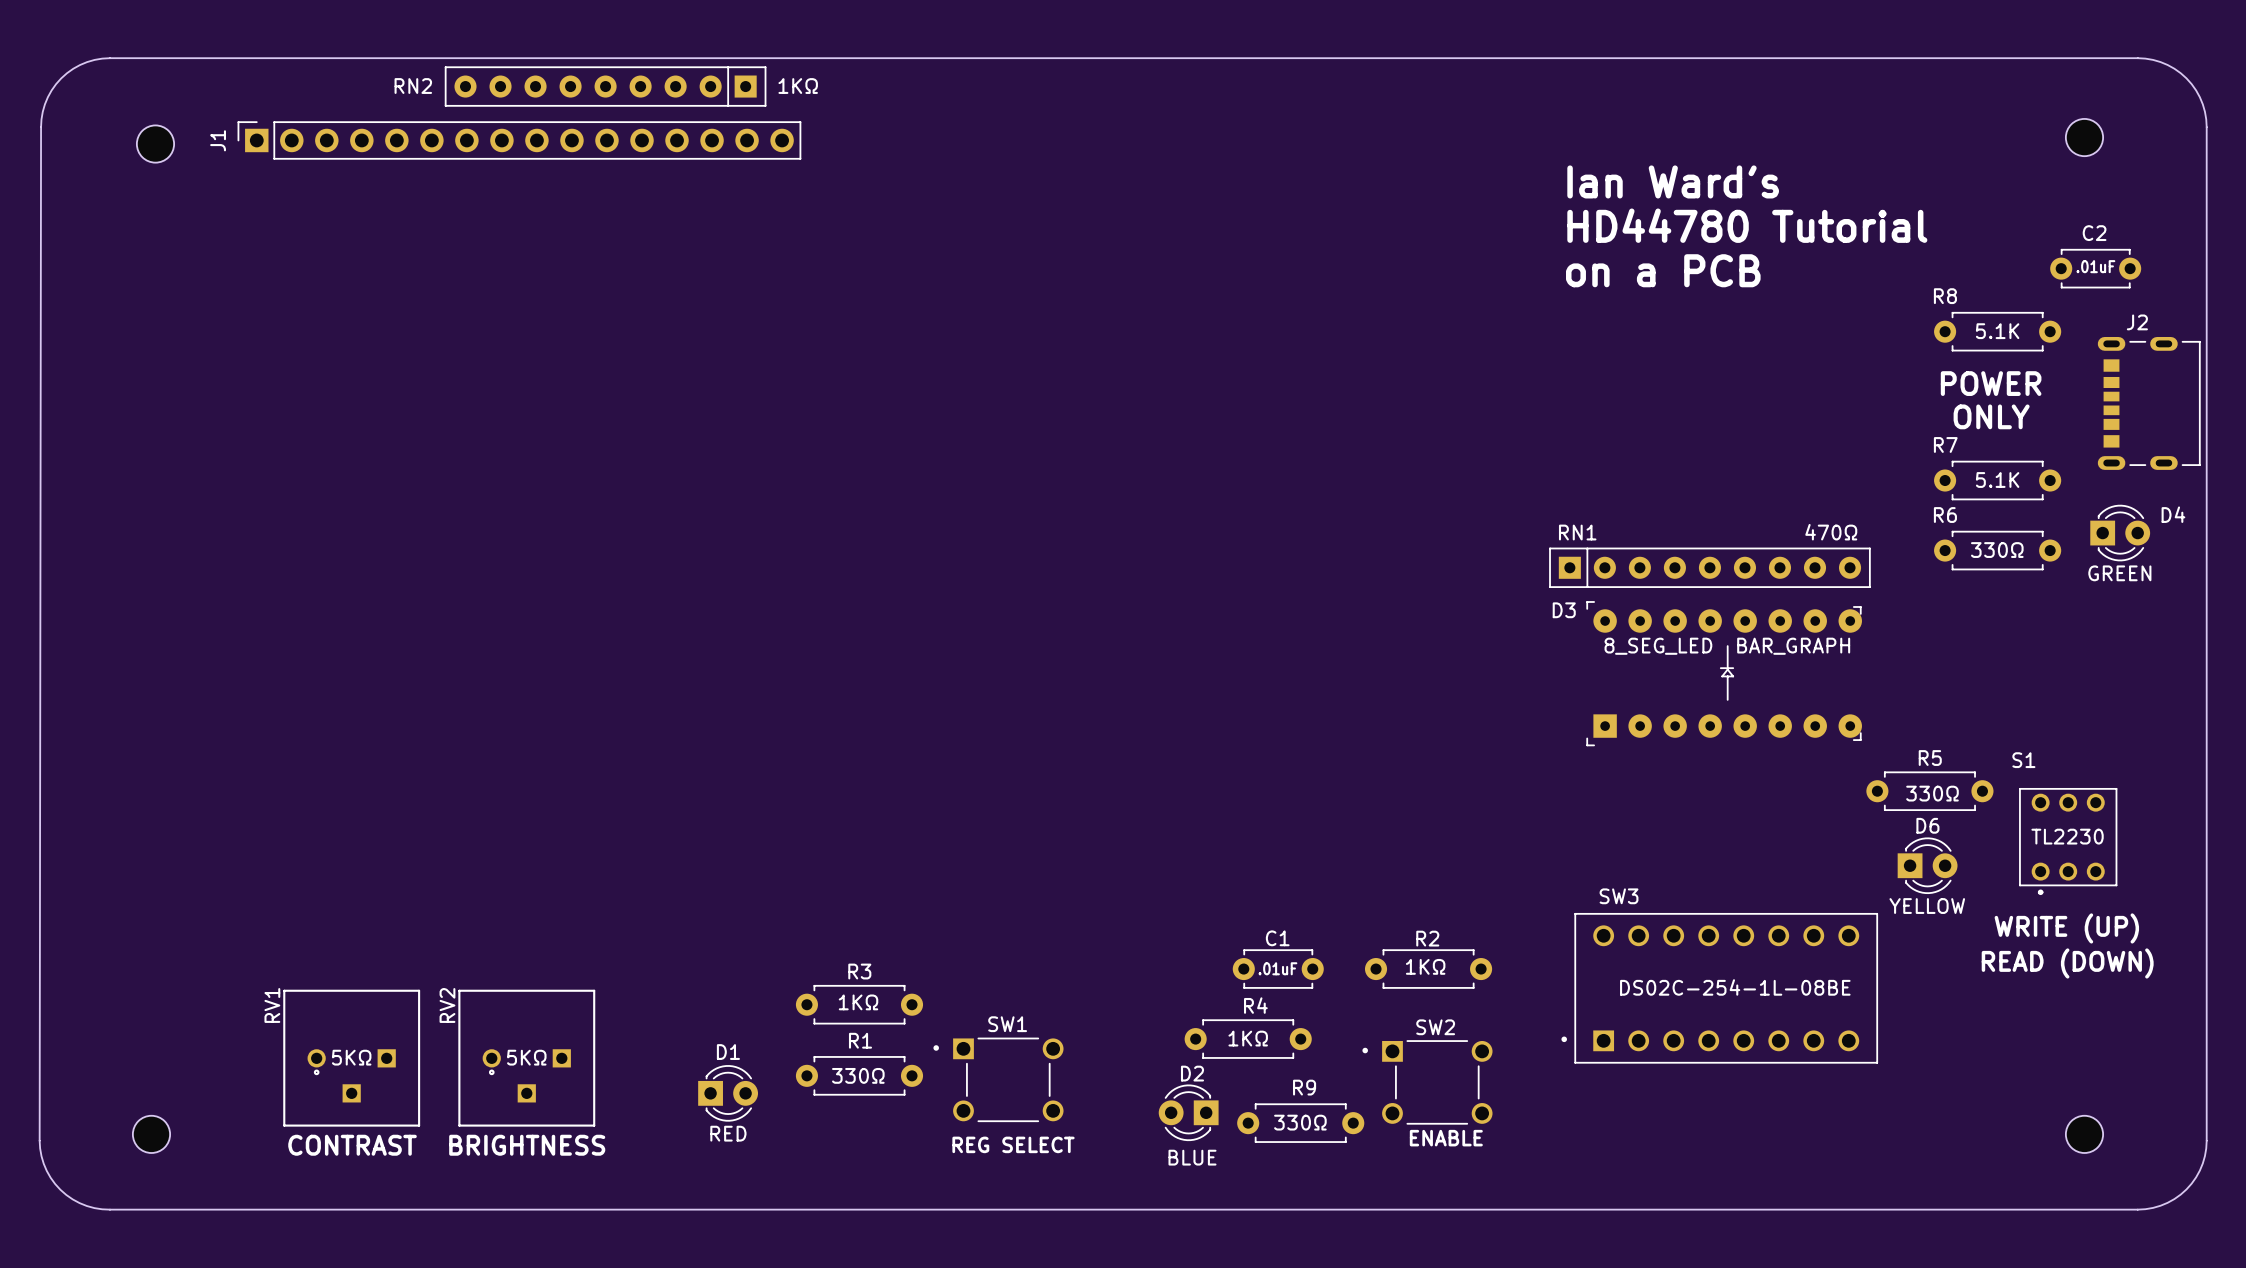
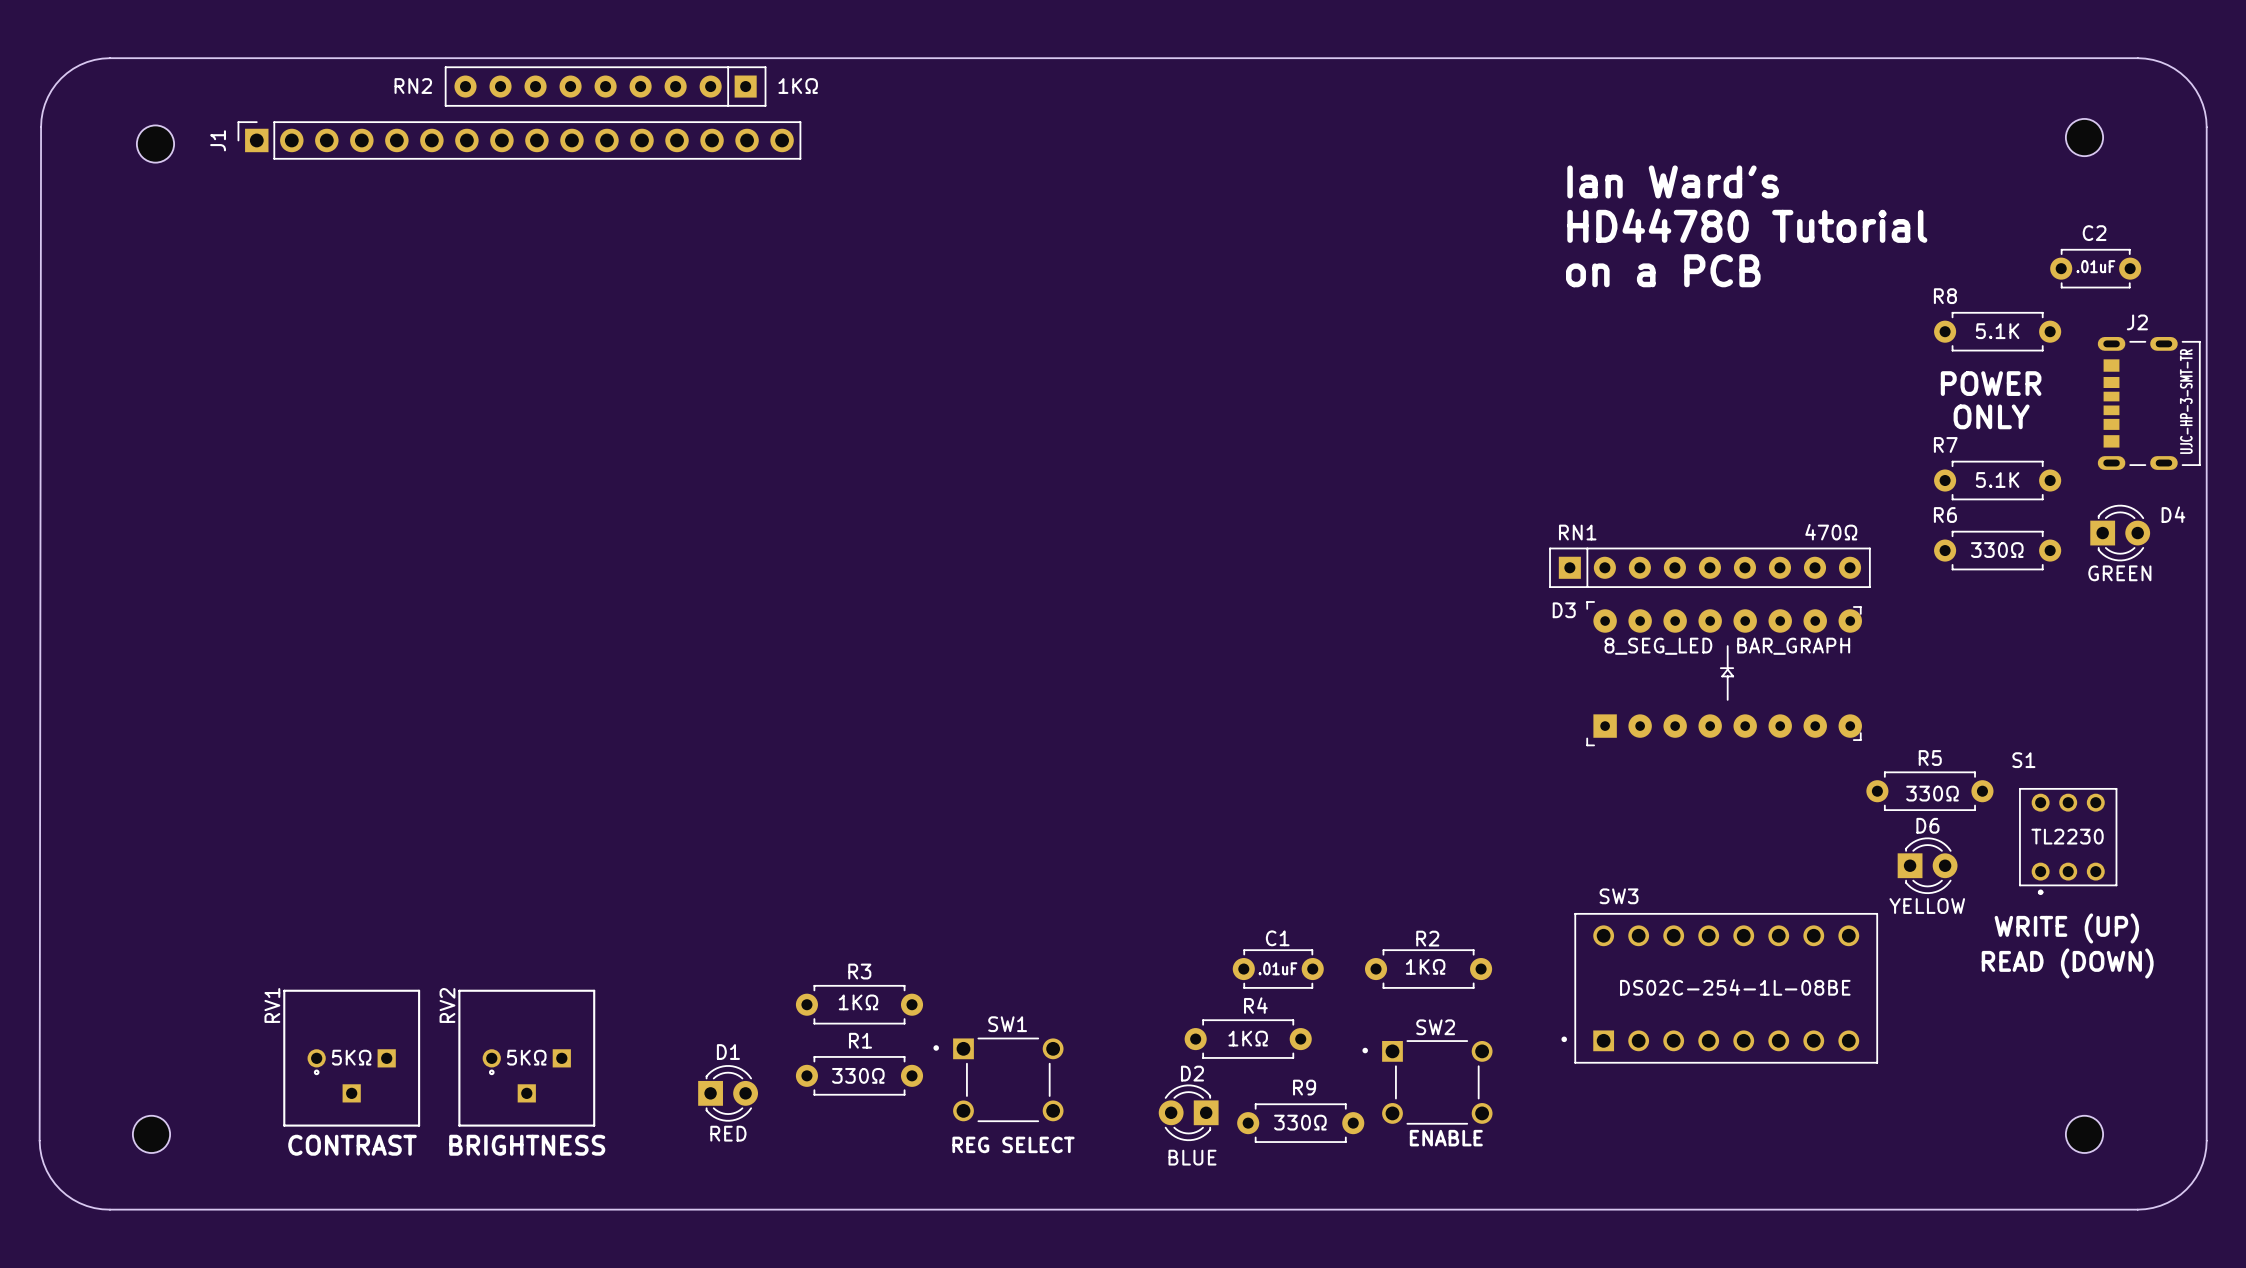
J2 value: none -> UJC-HP-3-SMT-TR (2186, 401)

